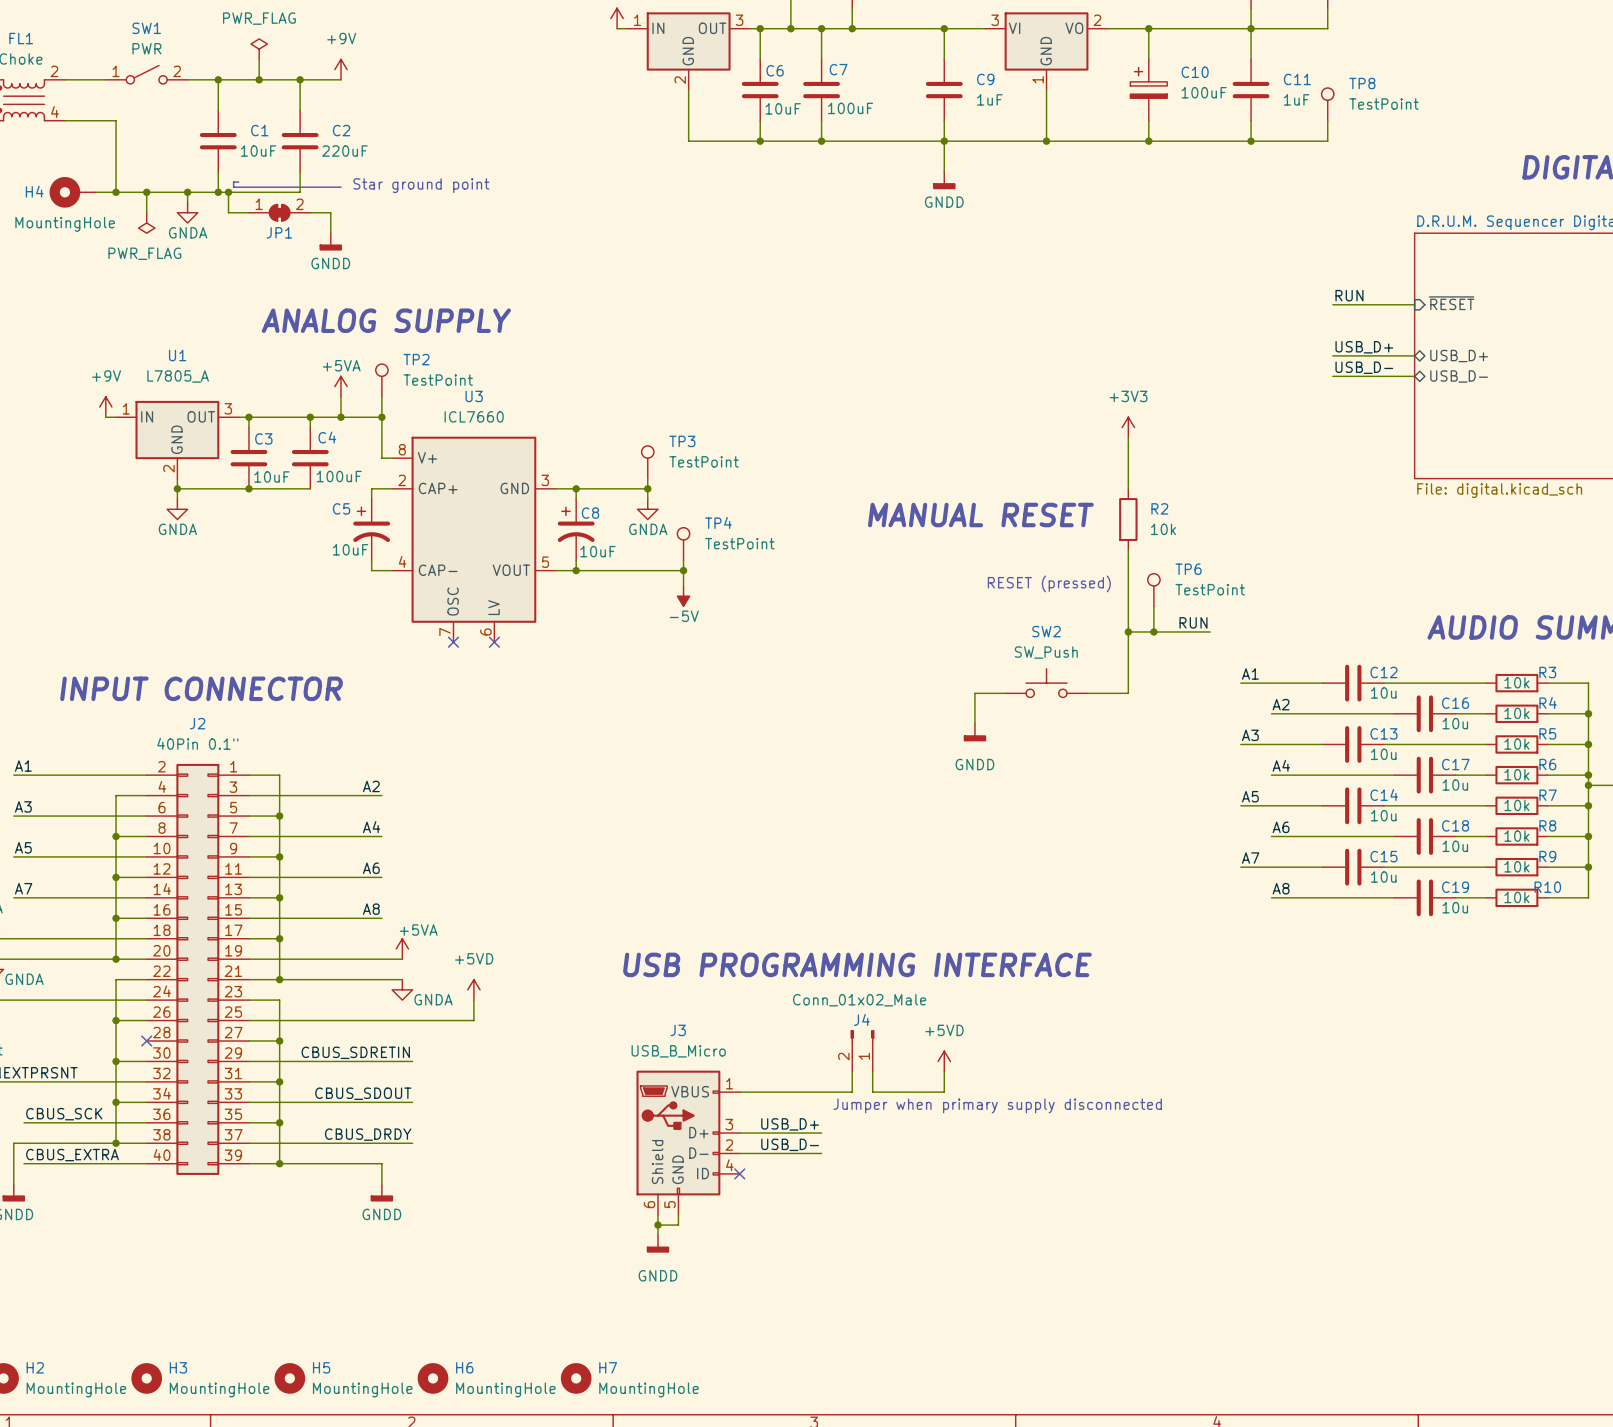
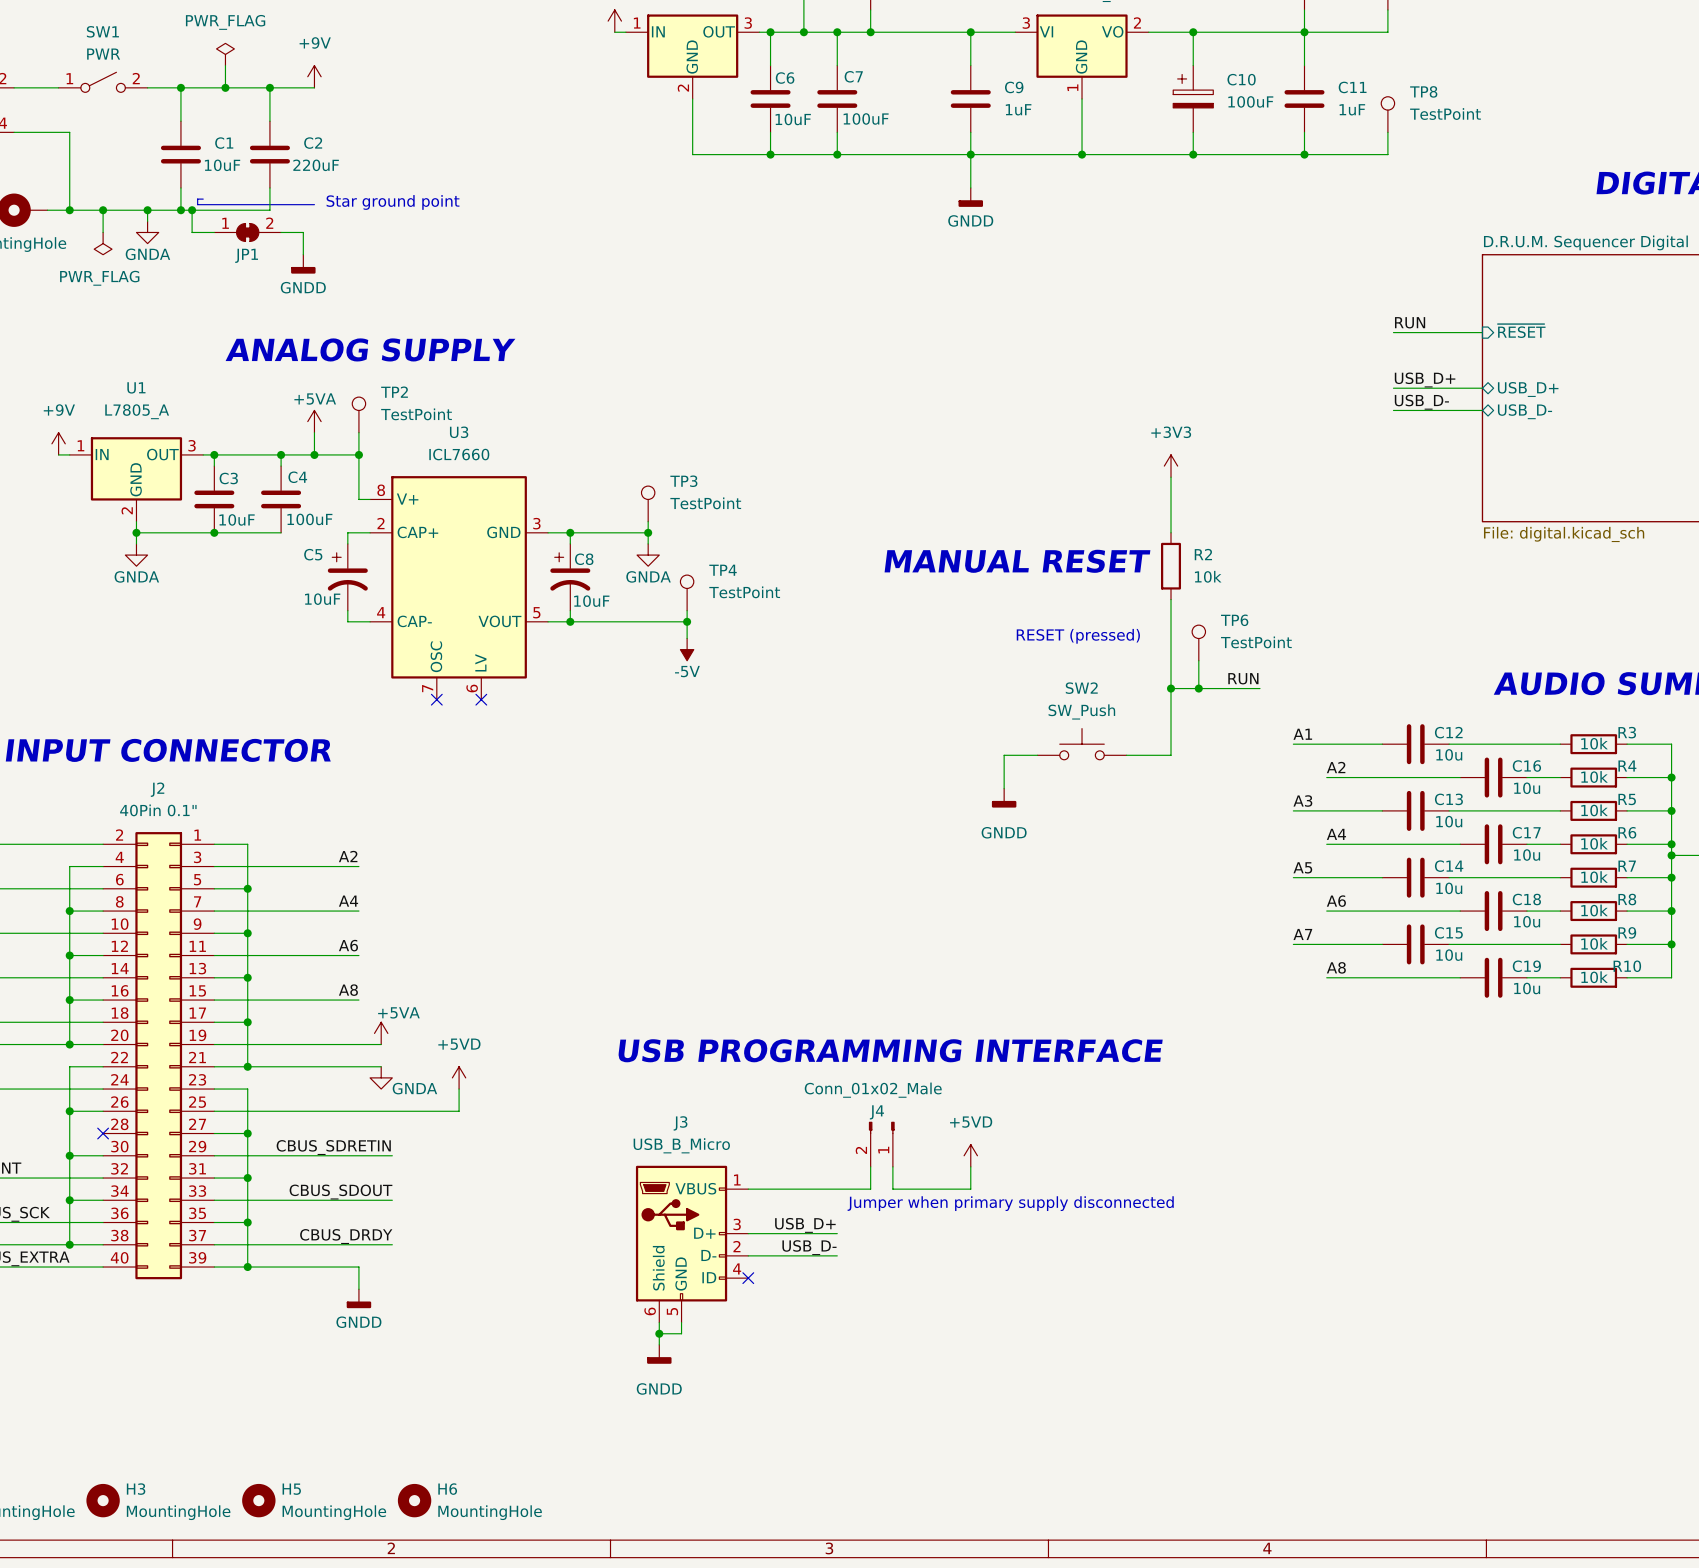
H7: MountingHole (576, 1378) -> none

